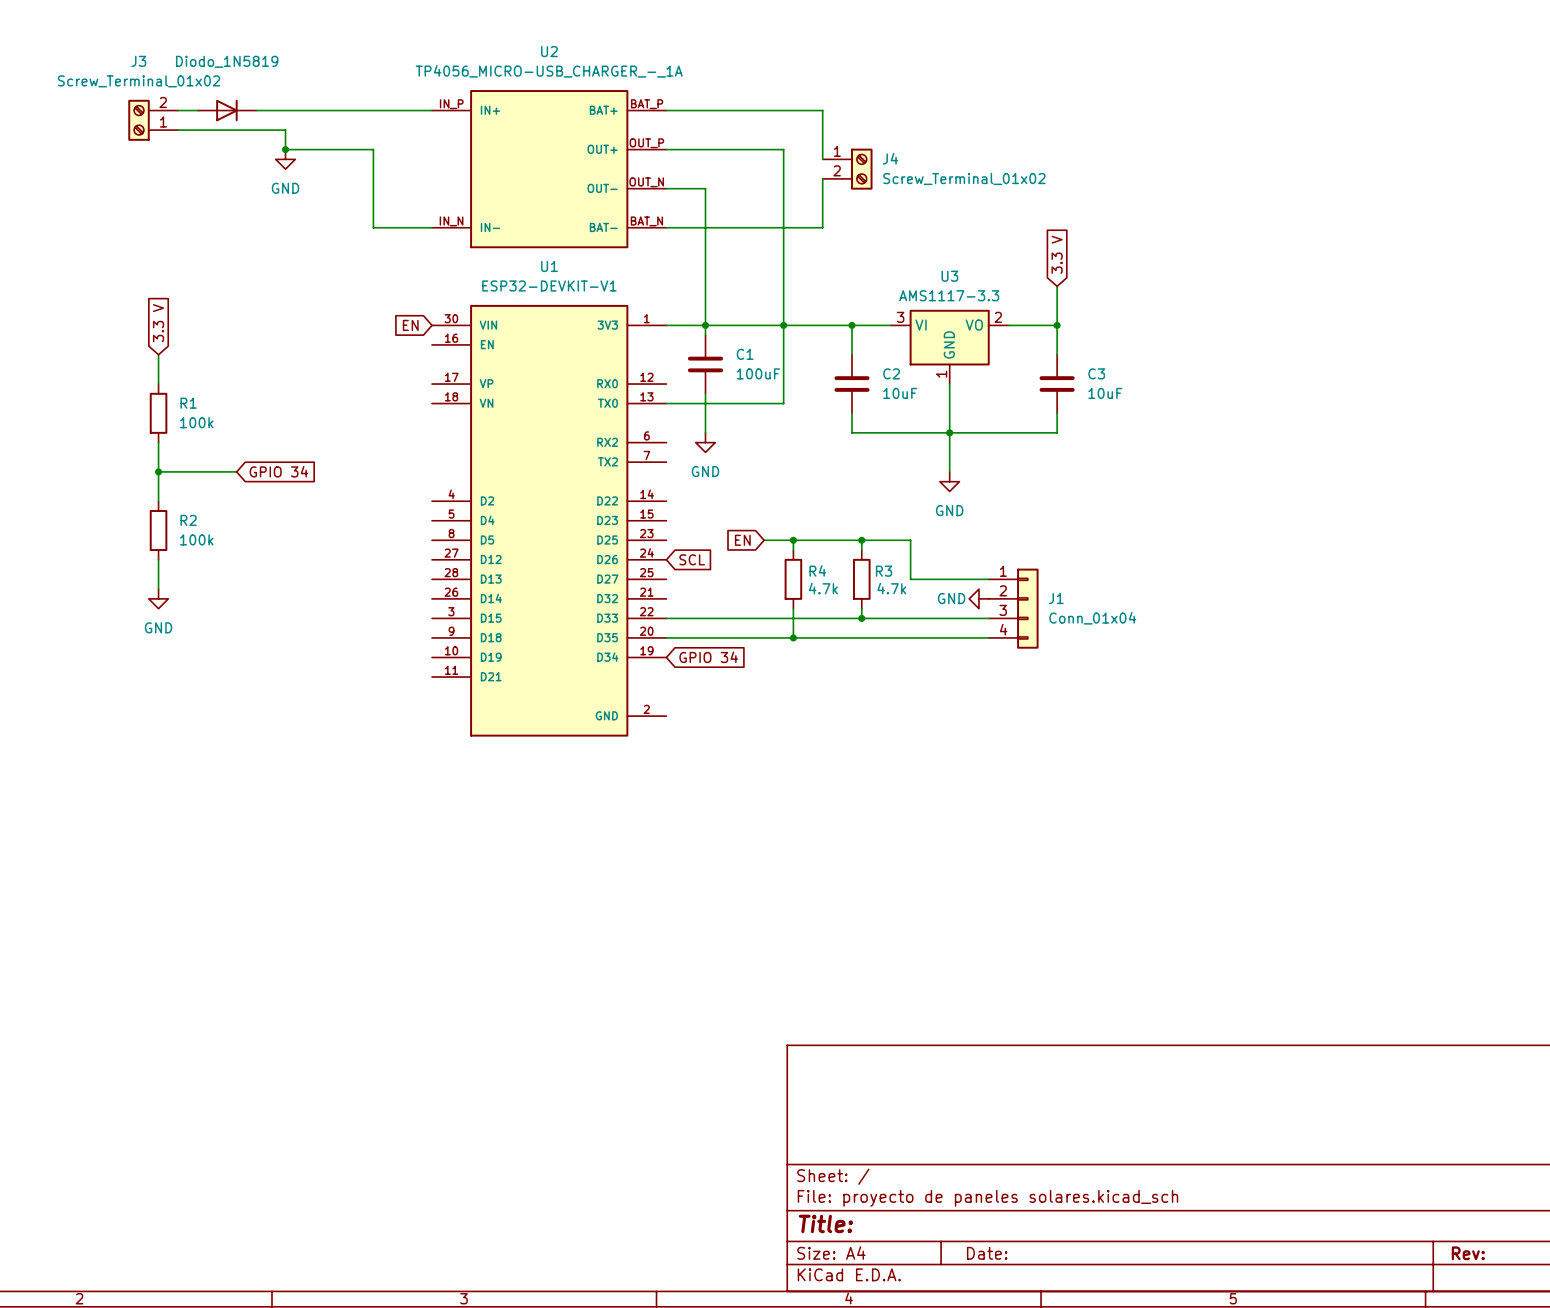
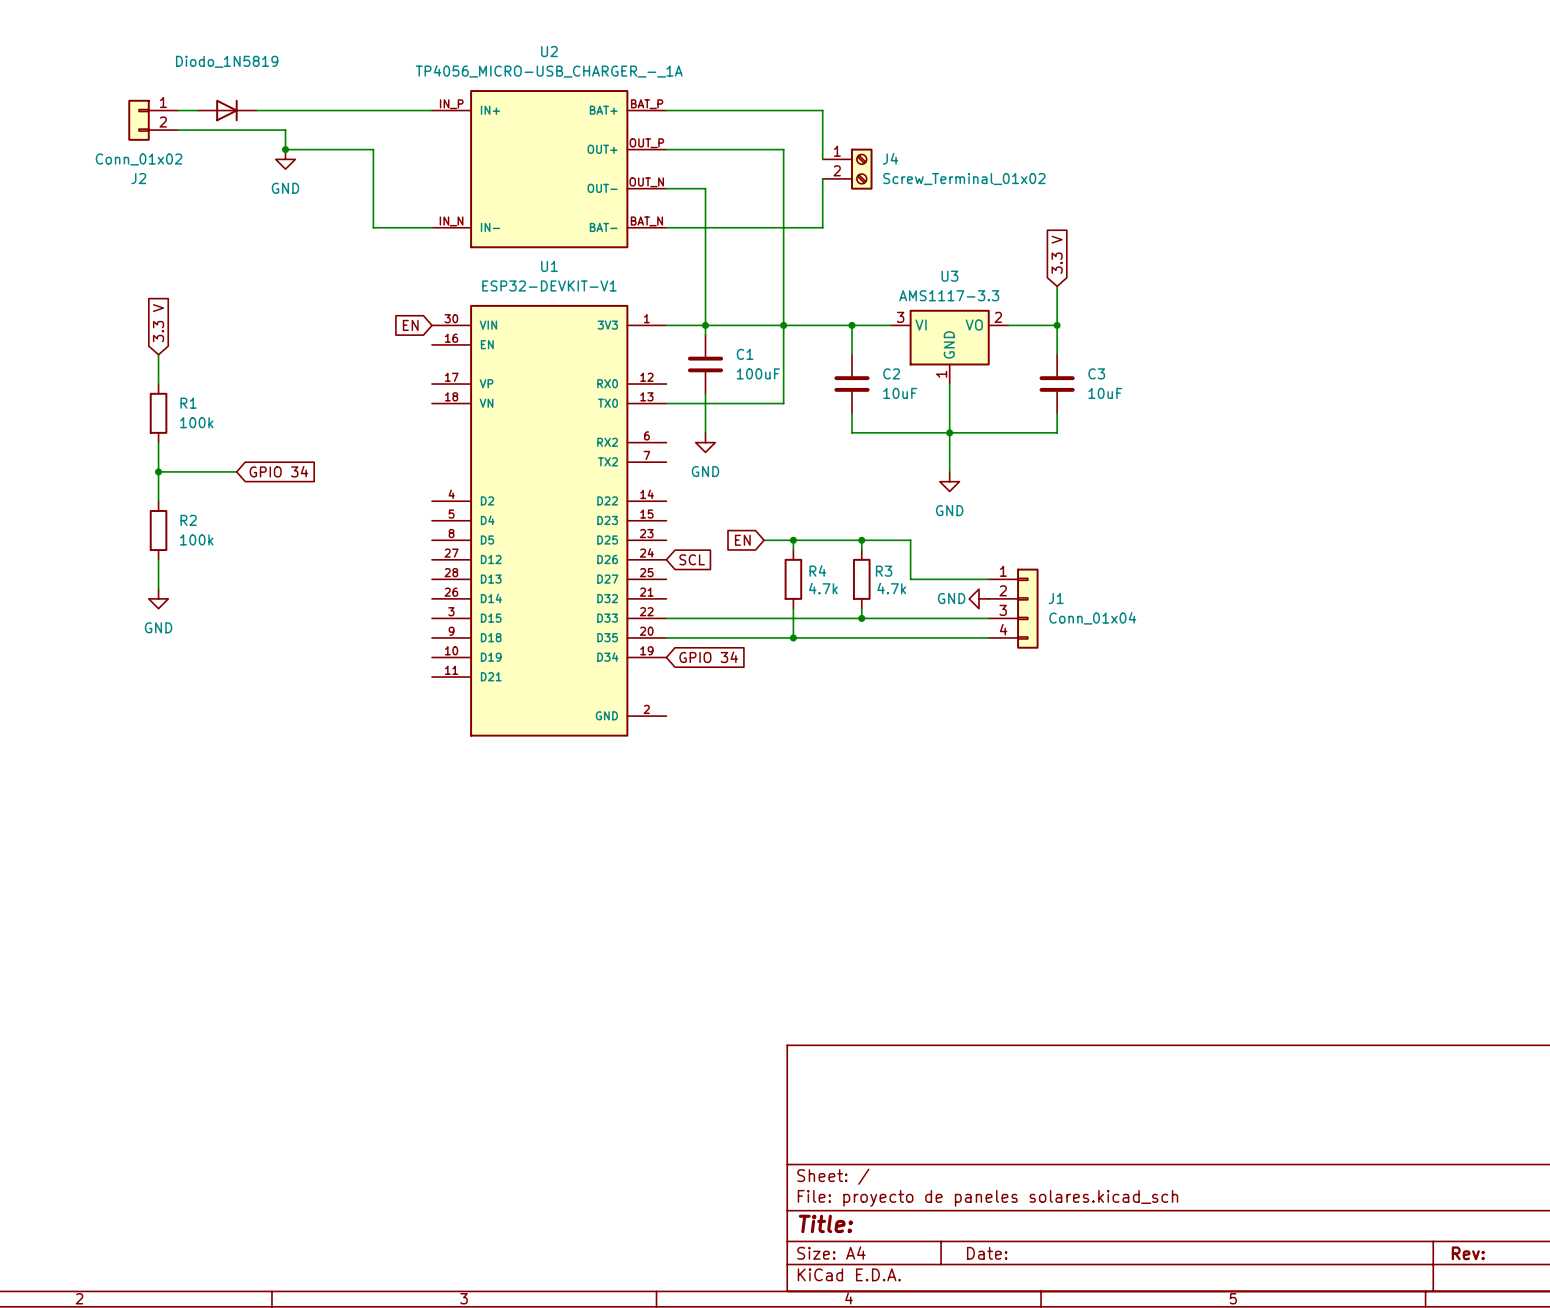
J3: Screw_Terminal_01x02 (153, 120) -> none
J2: none -> Conn_01x02 (153, 120)

